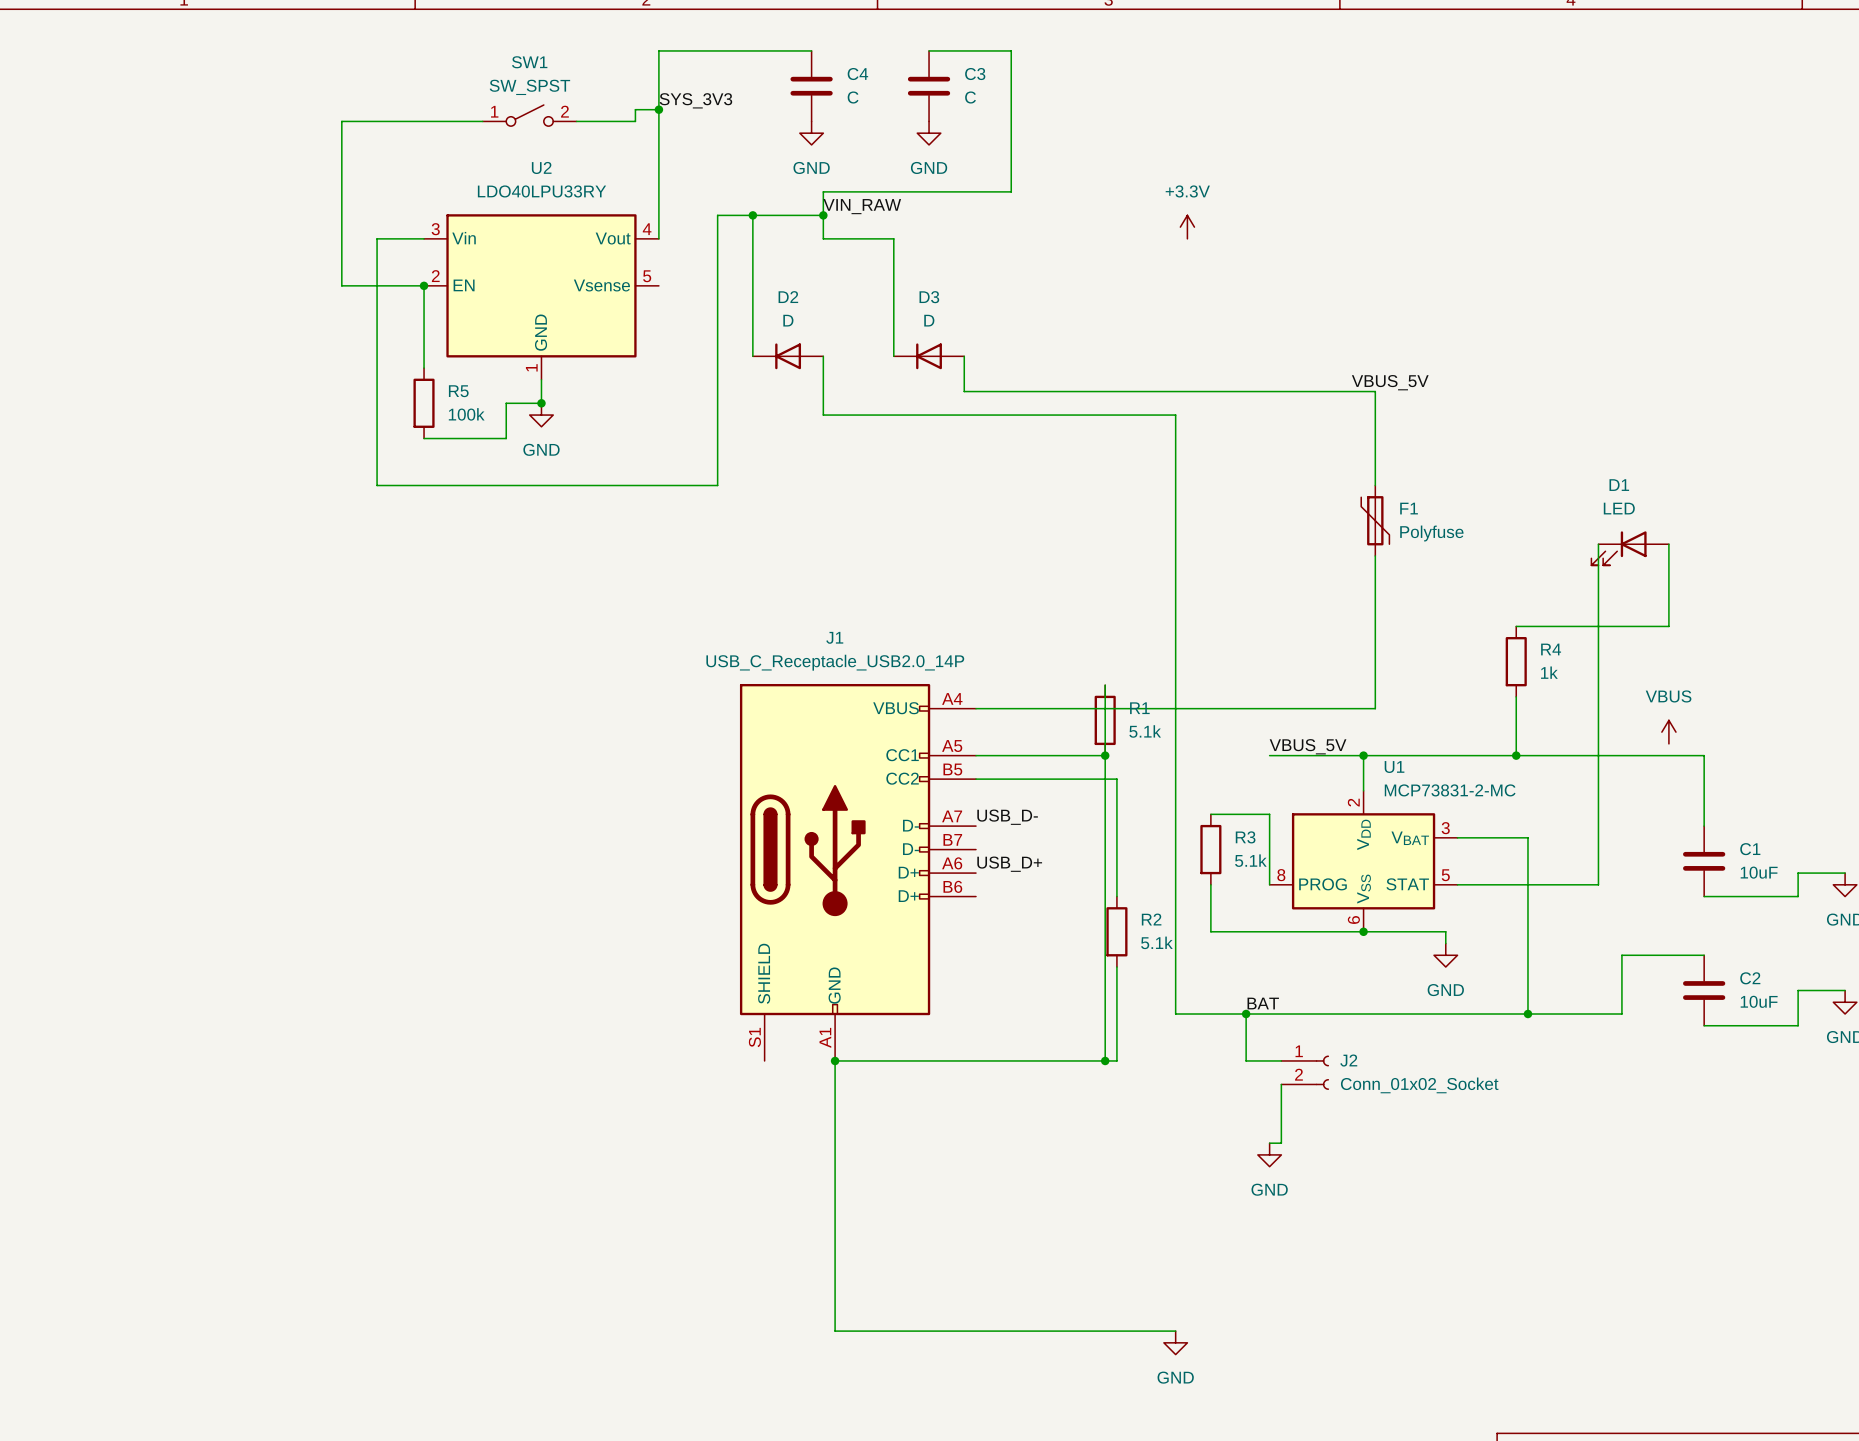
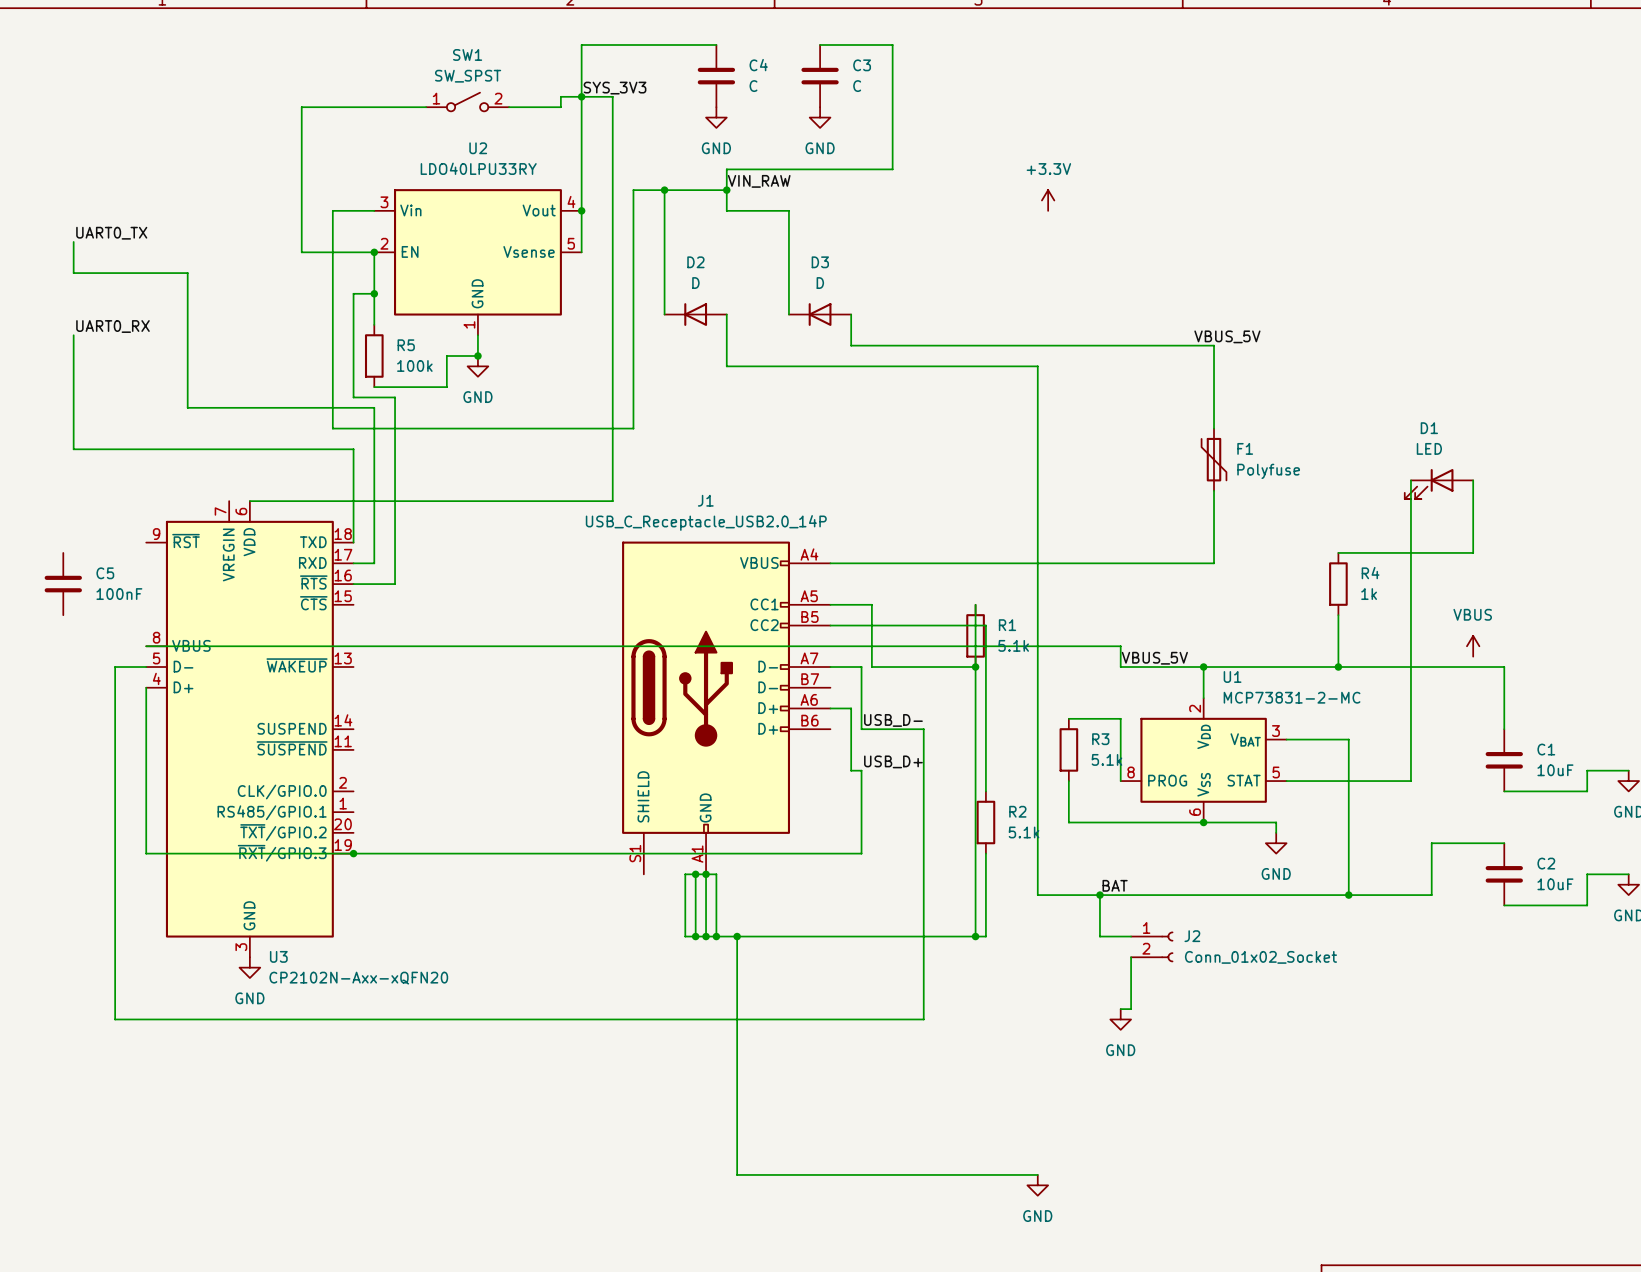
wire: none -> (581, 96) (612, 96) (612, 501) (249, 501)
wire: none -> (581, 210) (581, 252)
junction: none -> (581, 210)
label: none -> UART0_TX (111, 233)
wire: none -> (73, 241) (73, 273) (187, 273) (187, 407) (374, 407) (374, 563) (353, 563)
wire: none -> (374, 293) (353, 293) (353, 397) (395, 397) (395, 584) (353, 584)
junction: none -> (374, 293)
label: none -> UART0_RX (112, 326)
wire: none -> (73, 335) (73, 449) (353, 449) (353, 542)
wire: (1375, 638) (1375, 708) (1116, 708) -> (1214, 563) (830, 563)
C5: none -> 100nF (63, 584)
wire: none -> (146, 646) (1120, 646) (1120, 667)
wire: none -> (146, 667) (115, 667) (115, 1019) (923, 1019) (923, 729) (861, 729) (861, 667) (830, 667)
wire: (976, 755) (987, 755) -> (830, 604) (871, 604) (871, 667)
wire: none -> (146, 687) (146, 853) (861, 853) (861, 770) (851, 770) (851, 708) (830, 708)
wire: (976, 779) (1116, 779) -> (985, 625) (985, 687)
U3: none -> CP2102N-Axx-xQFN20 (249, 729)
J1 position: (857, 872) -> (726, 707)
junction: none -> (353, 853)
wire: none -> (695, 874) (695, 936)
junction: none -> (695, 874)
wire: none -> (706, 874) (706, 936)
junction: none -> (706, 874)
junction: none -> (695, 936)
junction: none -> (706, 936)
wire: none -> (716, 936) (716, 874) (685, 874) (685, 936) (737, 936)
junction: none -> (716, 936)
power symbol: none -> GND (249, 967)

